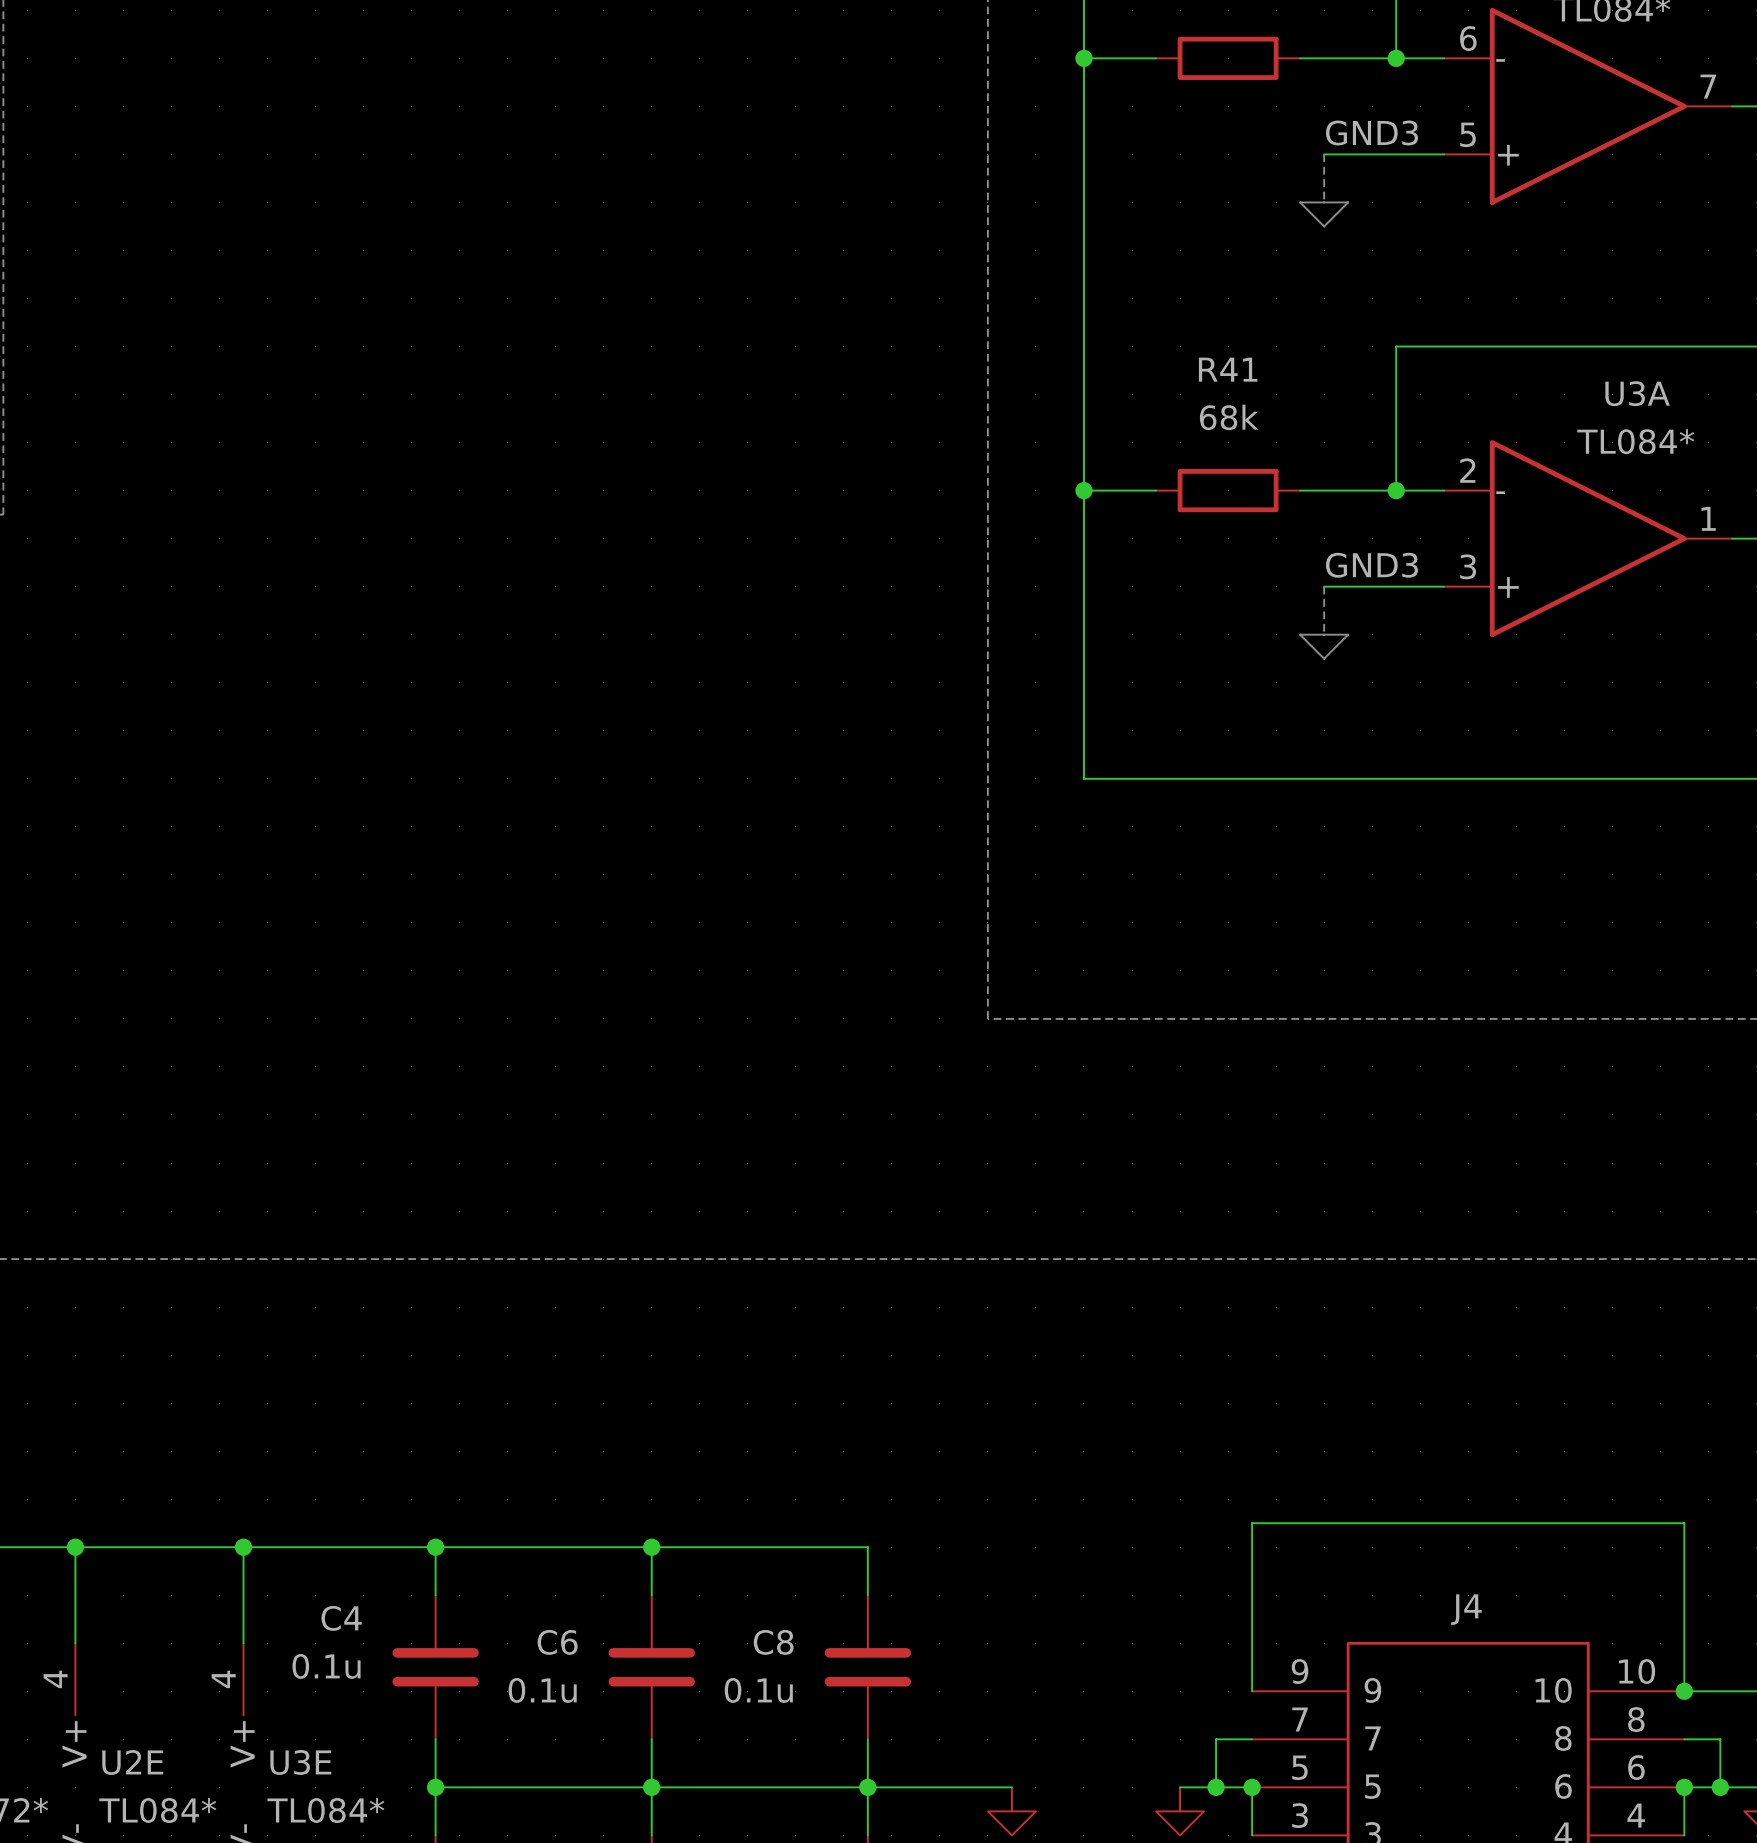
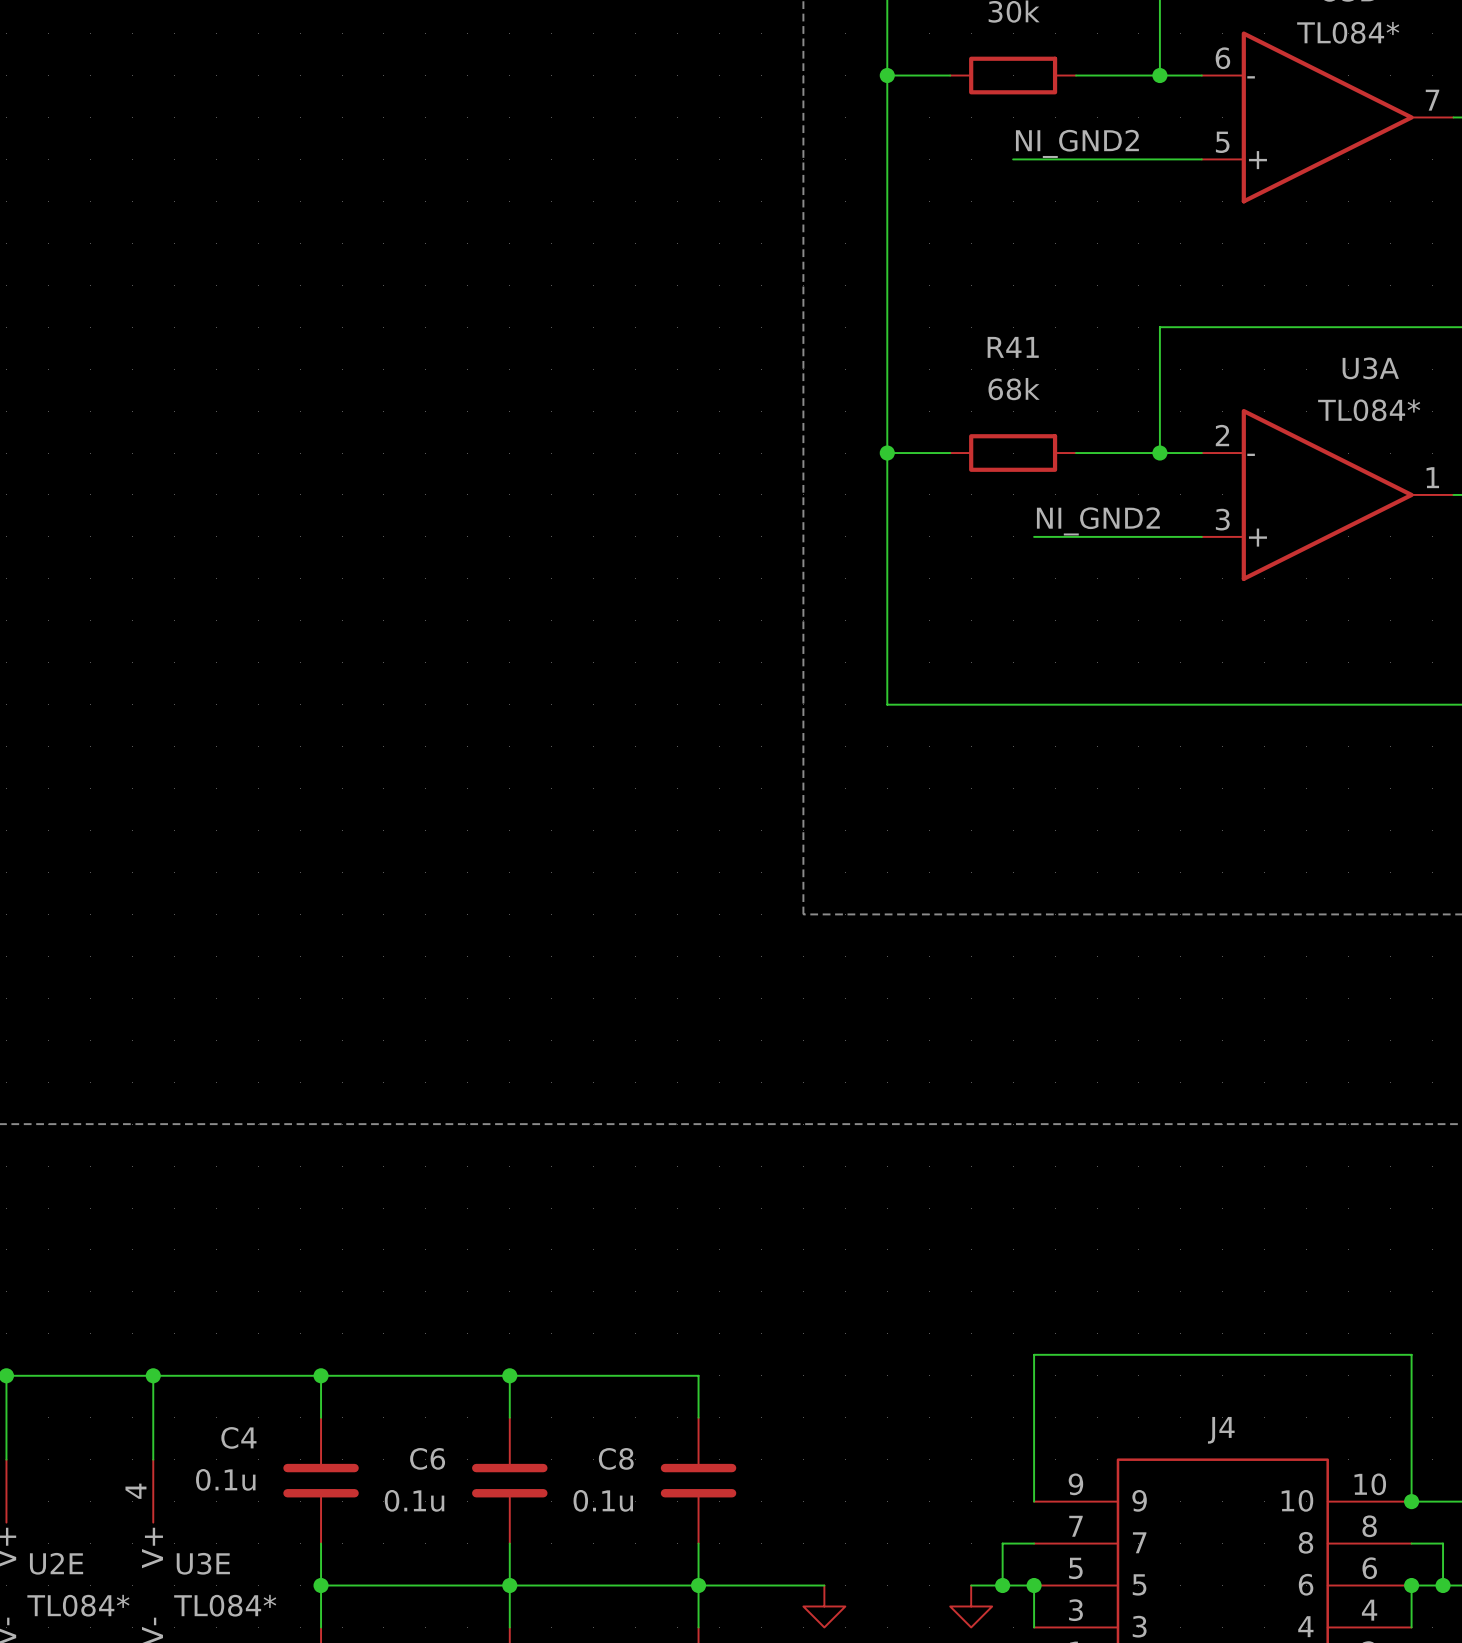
label: GND3 (1371, 133) -> none
label: none -> NI_GND2 (1077, 143)
wire: none -> (1013, 159) (1097, 159)
line: (1324, 154) (1324, 202) -> none
line: (1300, 202) (1348, 202) (1324, 226) (1300, 202) -> none
label: GND3 (1371, 565) -> none
label: none -> NI_GND2 (1098, 521)
wire: none -> (1034, 536) (1097, 536)
line: (1324, 586) (1324, 634) -> none
line: (1300, 634) (1348, 634) (1324, 658) (1300, 634) -> none

